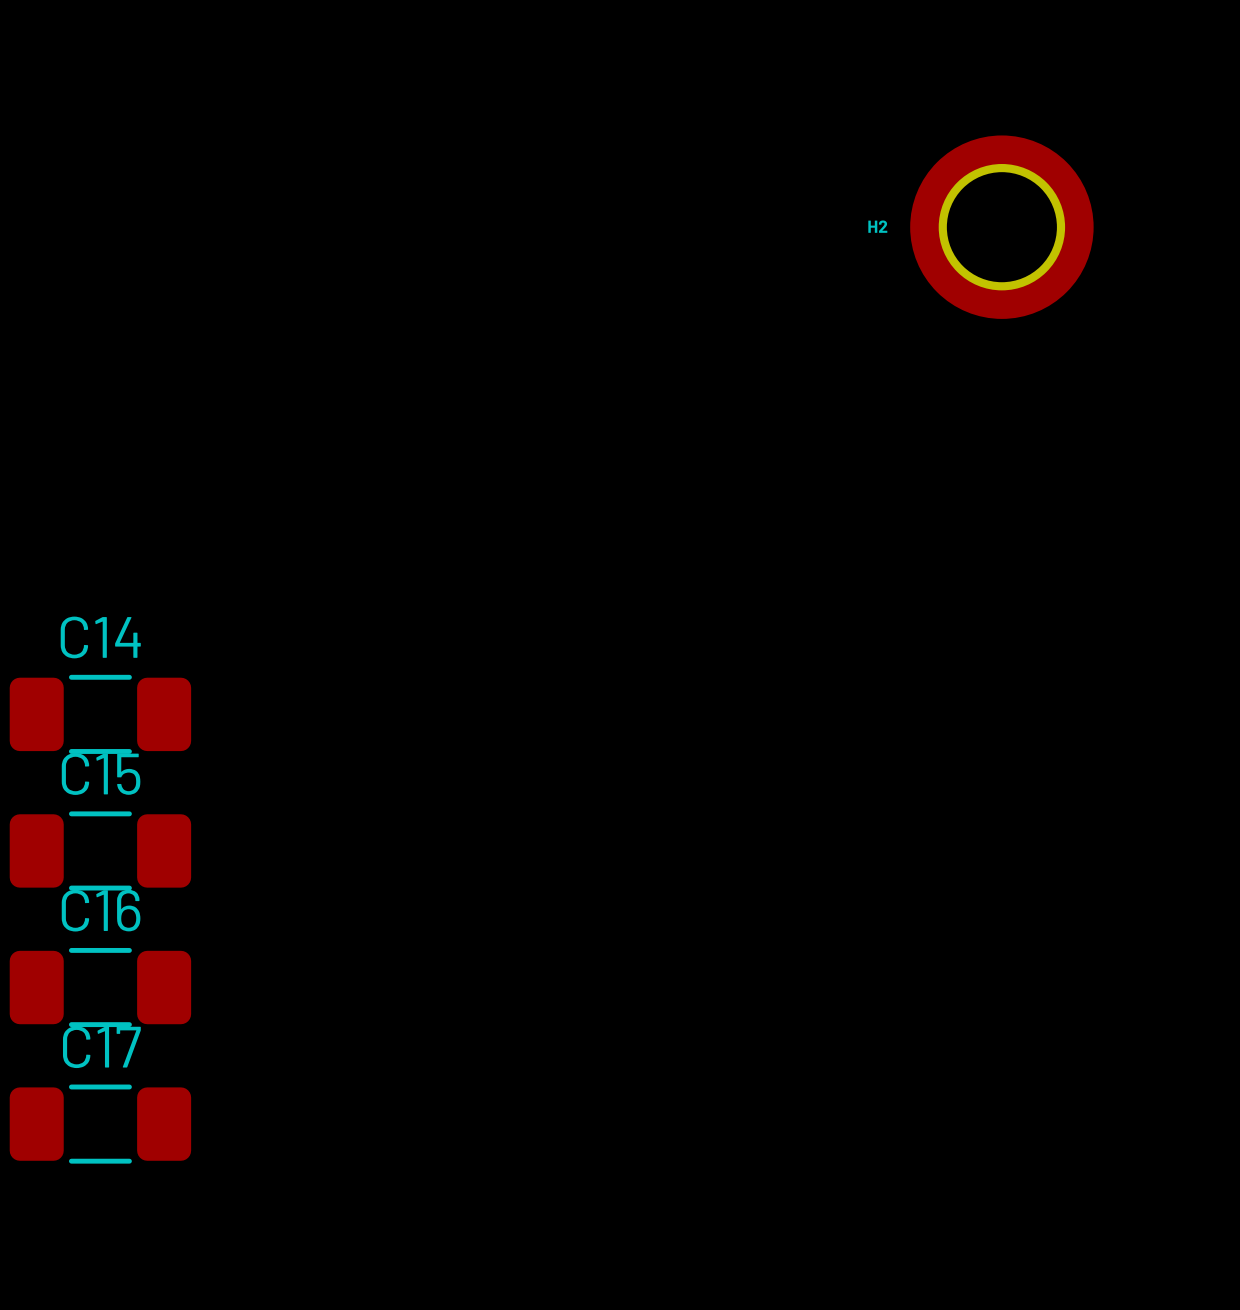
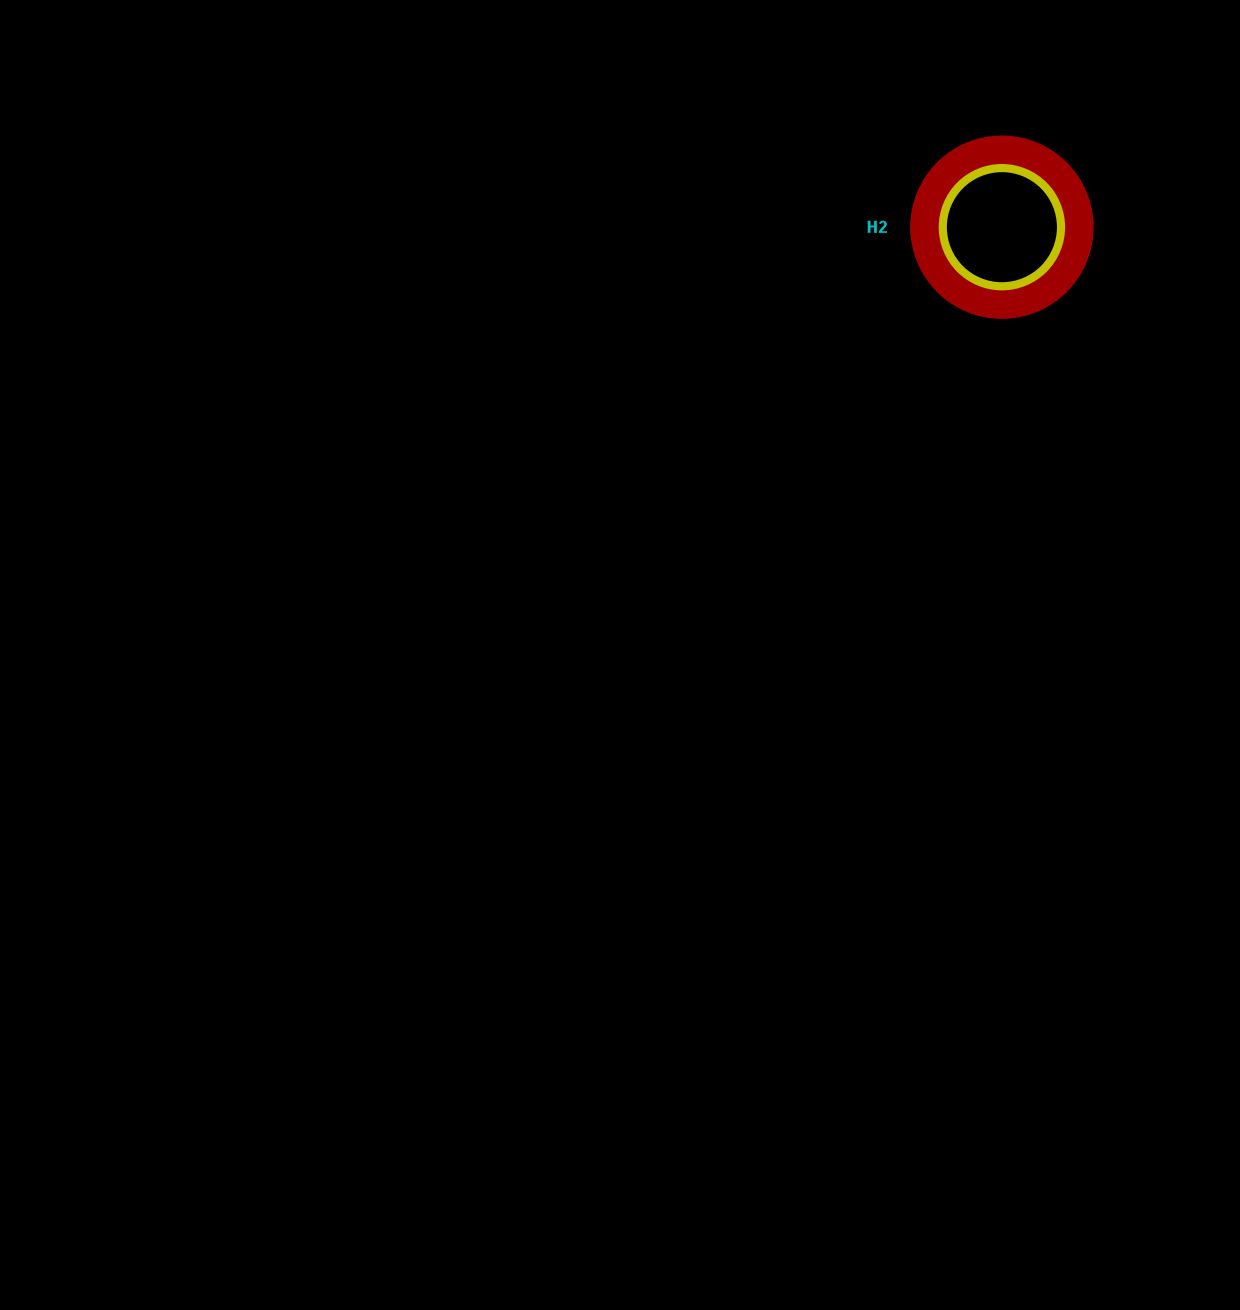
C14: (100, 714) -> none
C15: (100, 850) -> none
C16: (100, 987) -> none
C17: (100, 1124) -> none

